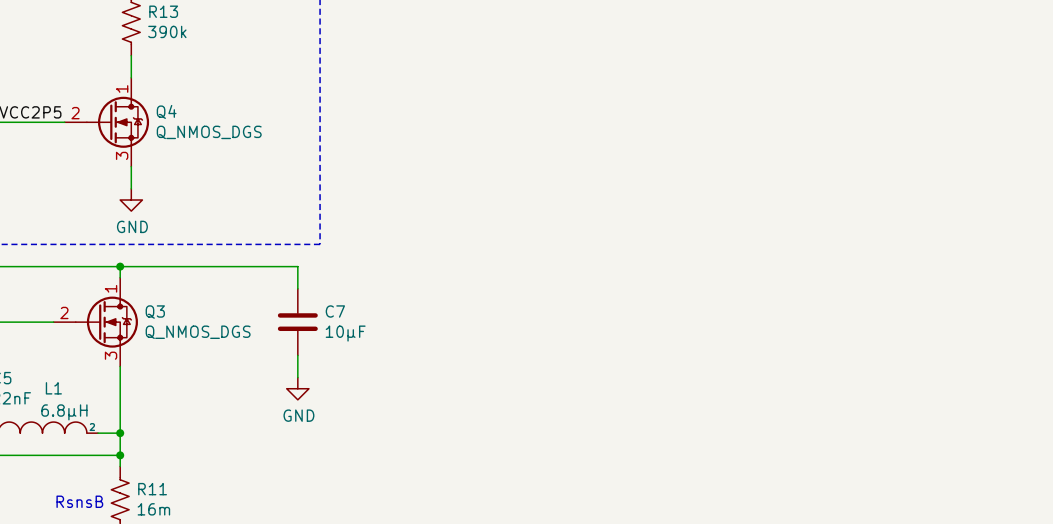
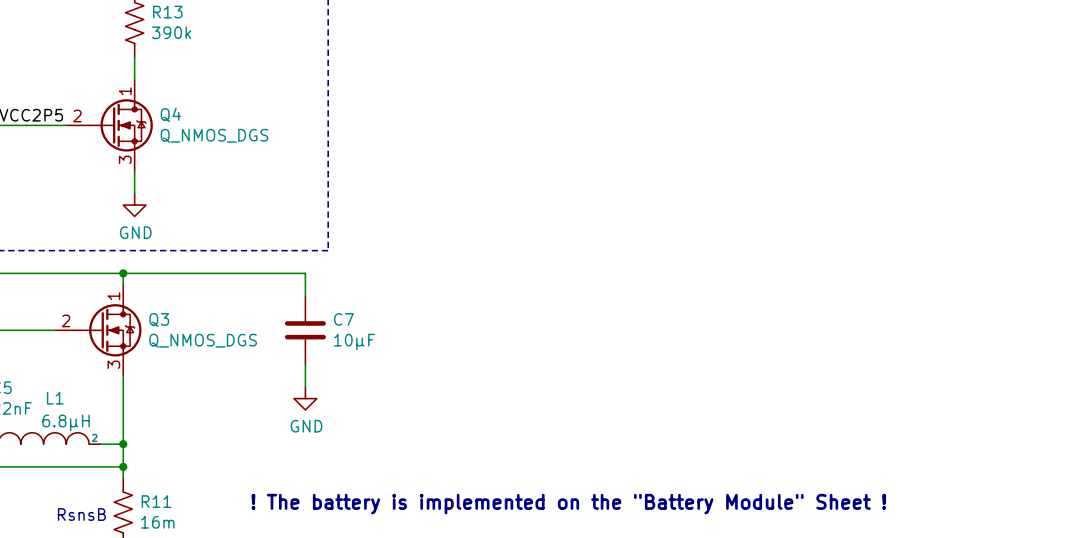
text: none -> ! The battery is implemented on the "Battery Module" Sheet ! (568, 504)

